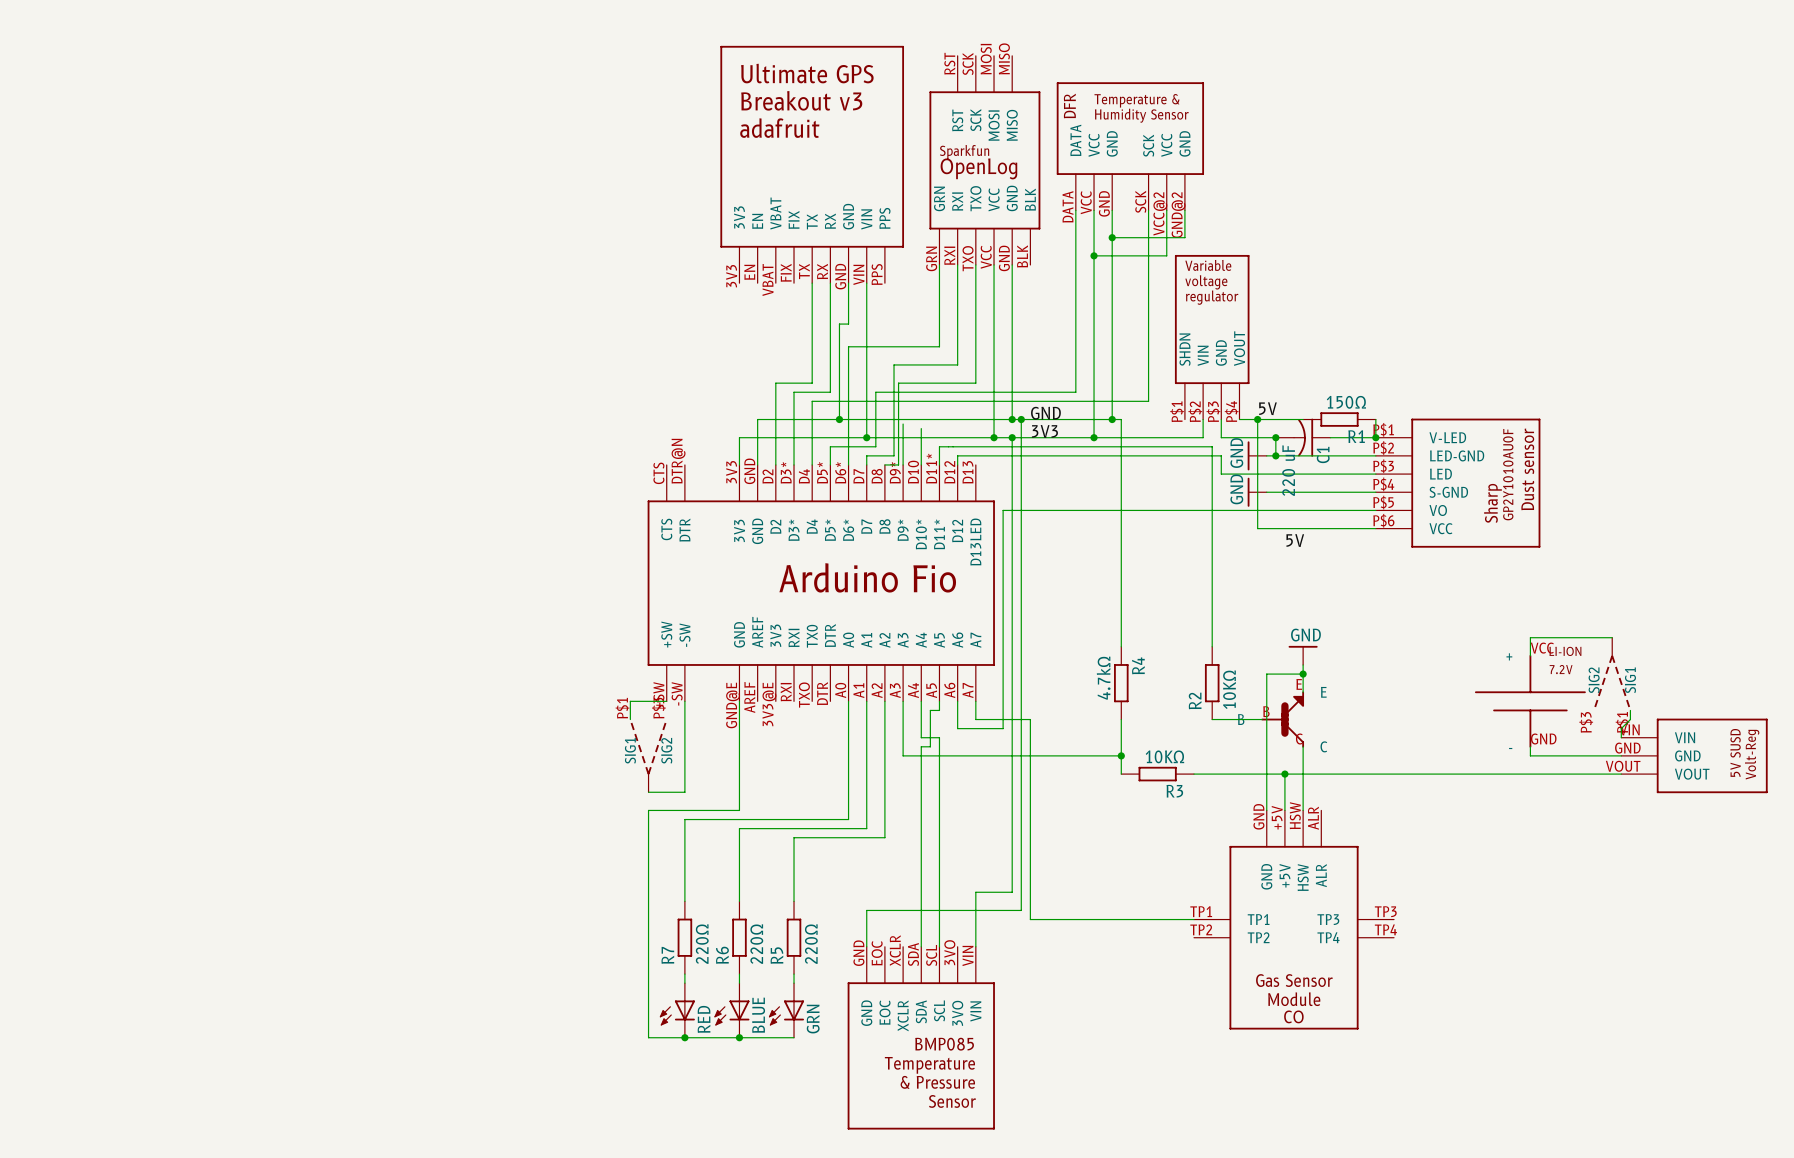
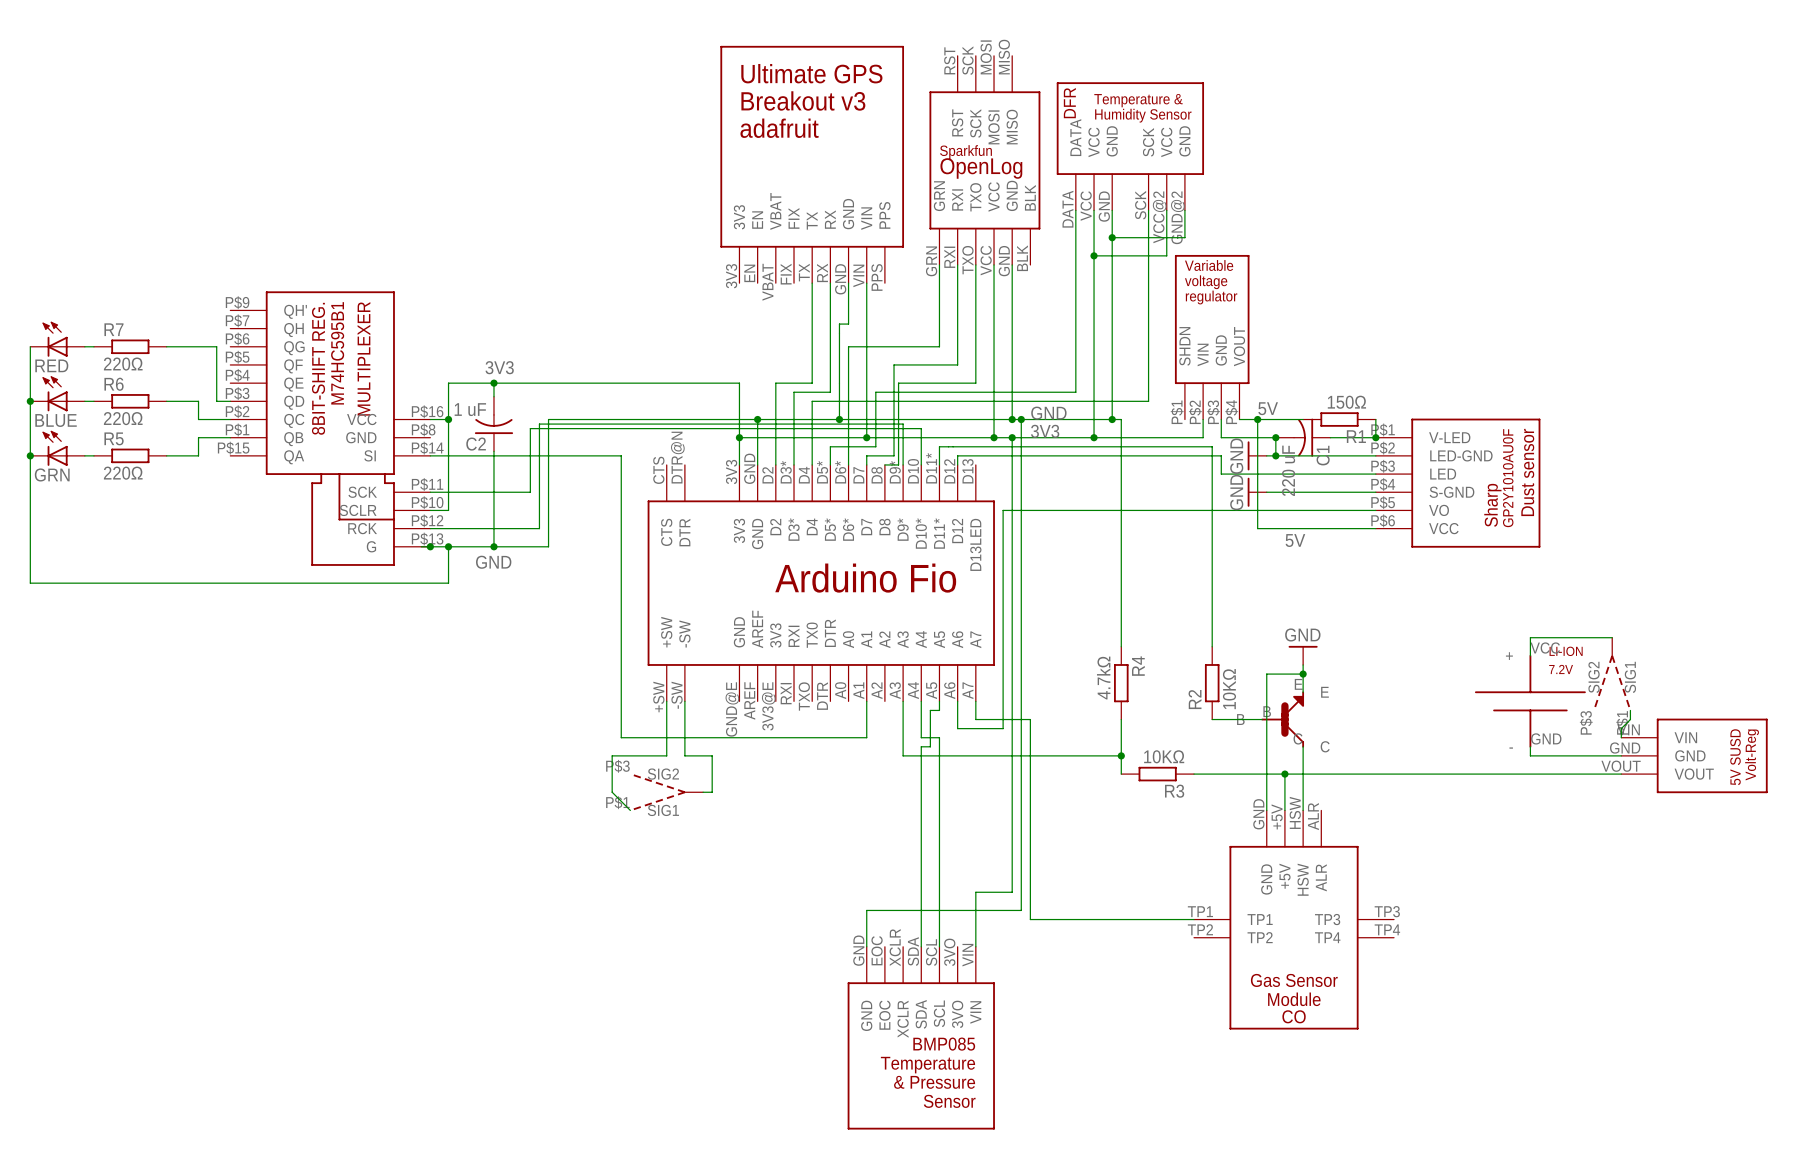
RED: none -> (57, 339)
wire: none -> (30, 346) (30, 583) (448, 583) (448, 546)
wire: none -> (84, 346) (93, 346)
wire: none -> (166, 346) (216, 346) (216, 401) (230, 401)
label: none -> 3V3 (499, 367)
wire: none -> (493, 383) (493, 396)
junction: none -> (493, 383)
BLUE: none -> (57, 393)
junction: none -> (30, 401)
wire: none -> (84, 401) (93, 401)
wire: none -> (166, 401) (198, 401) (198, 419) (230, 419)
wire: none -> (430, 419) (448, 419)
junction: none -> (448, 419)
wire: none -> (757, 419) (548, 419) (548, 546) (421, 546)
junction: none -> (757, 419)
C2: none -> 1 uF (493, 424)
wire: none -> (903, 424) (539, 424) (539, 528) (430, 528)
part: none -> (330, 428)
wire: none -> (921, 428) (530, 428) (530, 492) (430, 492)
wire: none -> (230, 437) (198, 437) (198, 455) (166, 455)
wire: none -> (739, 437) (739, 383) (448, 383) (448, 510) (430, 510)
junction: none -> (739, 437)
GRN: none -> (57, 448)
wire: none -> (493, 451) (493, 546)
junction: none -> (30, 455)
wire: none -> (84, 455) (93, 455)
junction: none -> (430, 546)
junction: none -> (448, 546)
junction: none -> (493, 546)
label: none -> GND (493, 562)
wire: (666, 701) (630, 701) (630, 719) -> (666, 701) (666, 755) (612, 755) (612, 792) (630, 810)
wire: (739, 701) (739, 810) (648, 810) (648, 1037) (794, 1037) -> none
wire: (848, 701) (848, 819) (684, 819) (684, 901) -> none
wire: (884, 701) (884, 837) (794, 837) (794, 901) -> none
wire: (866, 737) (866, 828) (739, 828) (739, 901) -> (866, 737) (621, 737) (621, 455) (430, 455)
part rotation: 0° (648, 746) -> 90° counterclockwise (657, 792)
wire: (684, 755) (684, 792) (648, 792) -> (684, 755) (712, 755) (712, 792) (703, 792)
R7 rotation: 0° (684, 937) -> 90° clockwise (130, 346)
R7 position: (684, 937) -> (130, 346)
R6 rotation: 0° (739, 937) -> 90° clockwise (130, 401)
R6 position: (739, 937) -> (130, 401)
R5 rotation: 0° (794, 937) -> 90° clockwise (130, 455)
R5 position: (794, 937) -> (130, 455)
wire: (684, 974) (684, 983) -> none
wire: (739, 974) (739, 983) -> none
wire: (794, 974) (794, 983) -> none
RED: (677, 1010) -> none
BLUE: (731, 1010) -> none
GRN: (786, 1010) -> none
junction: (684, 1037) -> none
junction: (739, 1037) -> none

